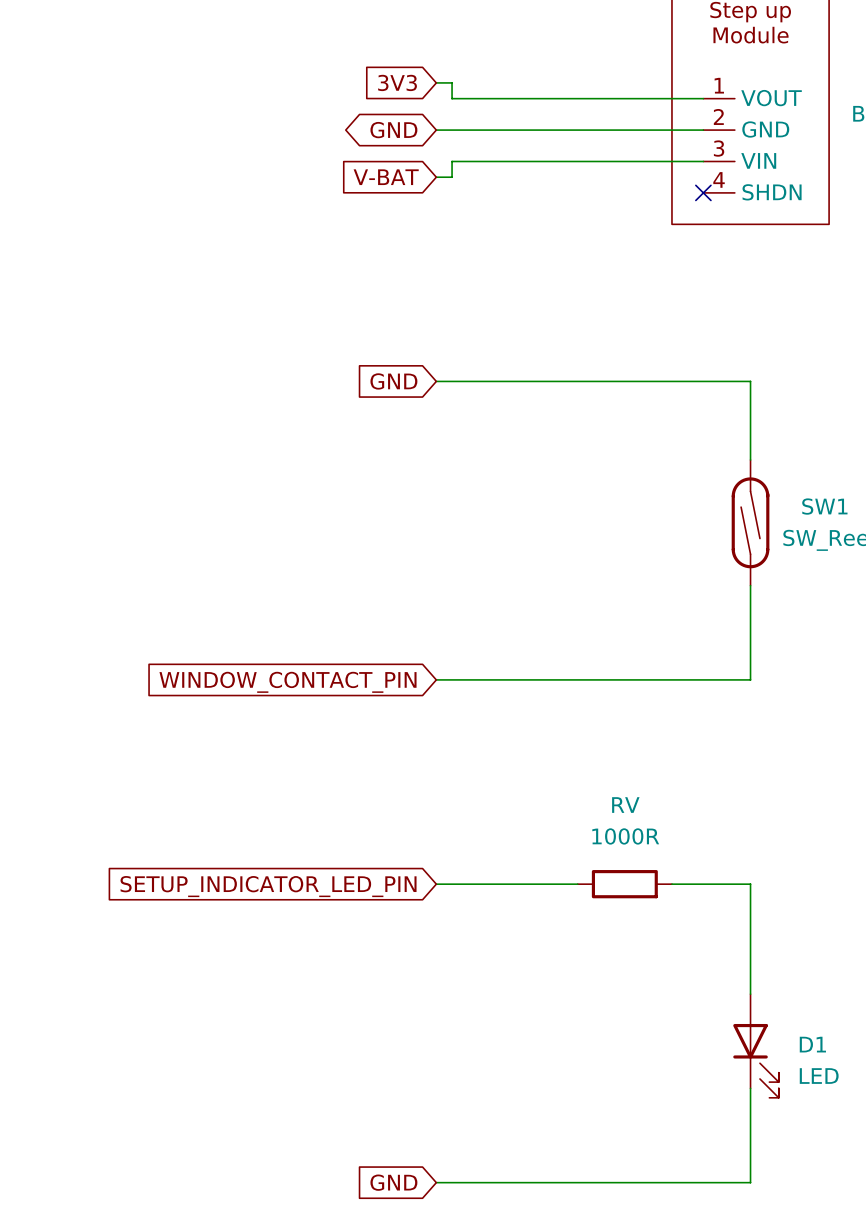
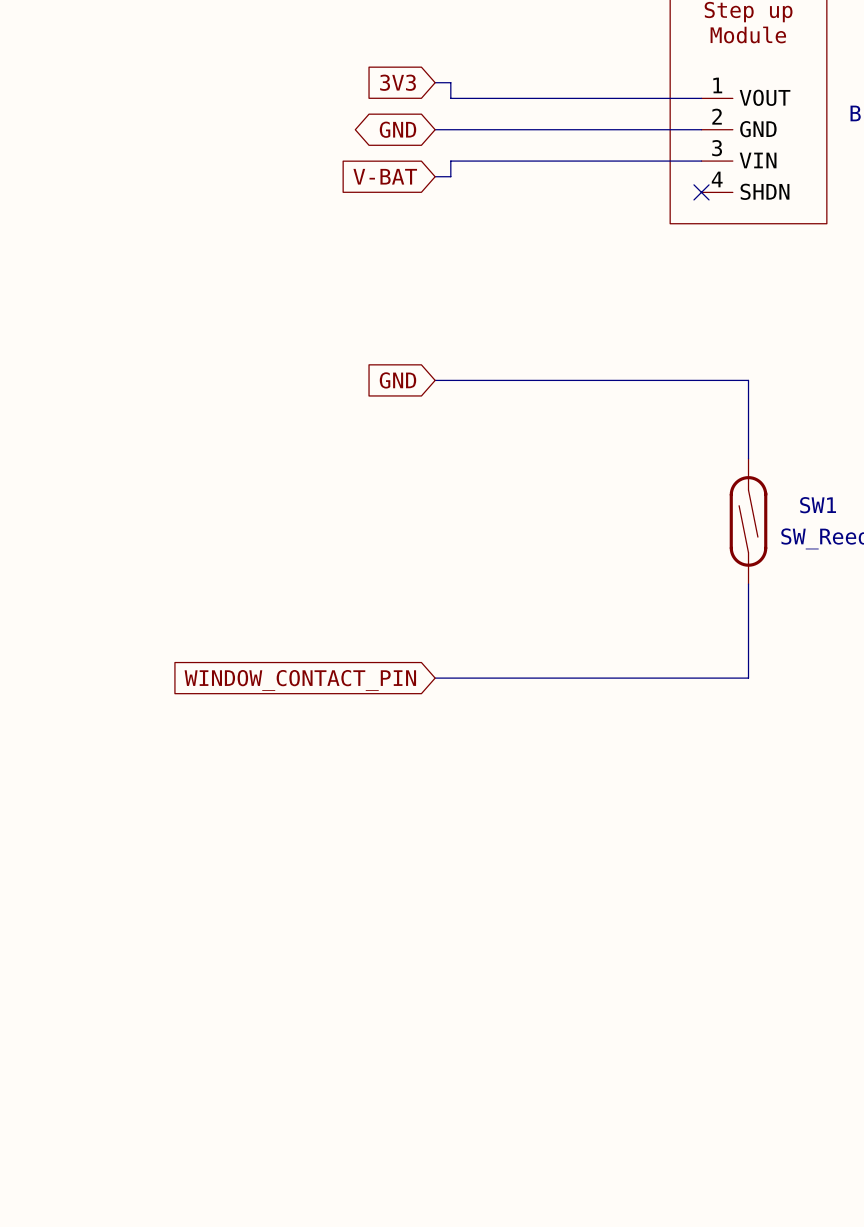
wire: (436, 884) (577, 884) -> none
RV: 1000R (624, 884) -> none
wire: (671, 884) (750, 884) (750, 994) -> none
global label: SETUP_INDICATOR_LED_PIN (268, 886) -> none
D1: LED (756, 1045) -> none
wire: (750, 1088) (750, 1182) (436, 1182) -> none
global label: GND (393, 1182) -> none

